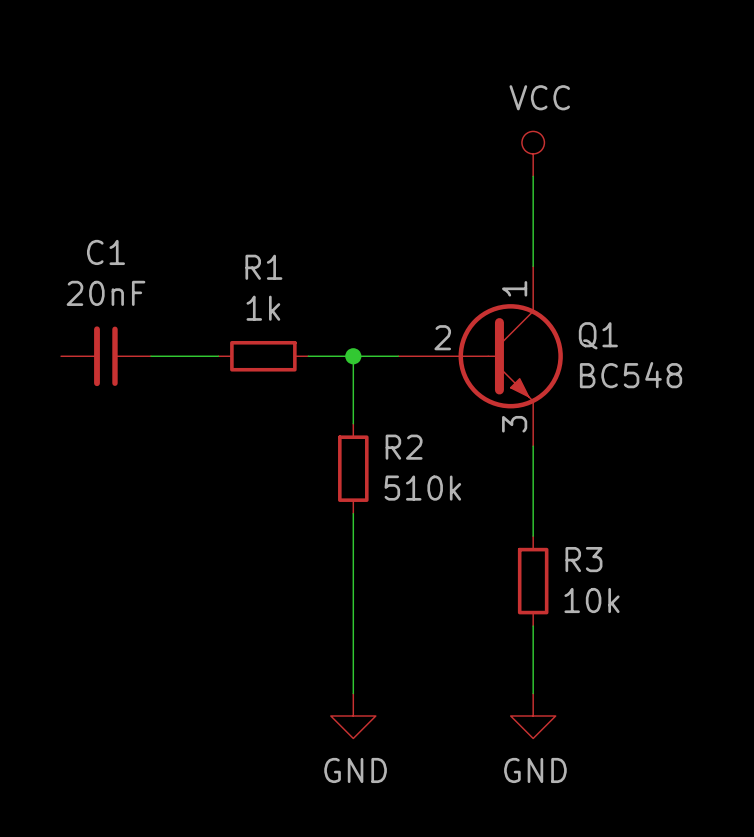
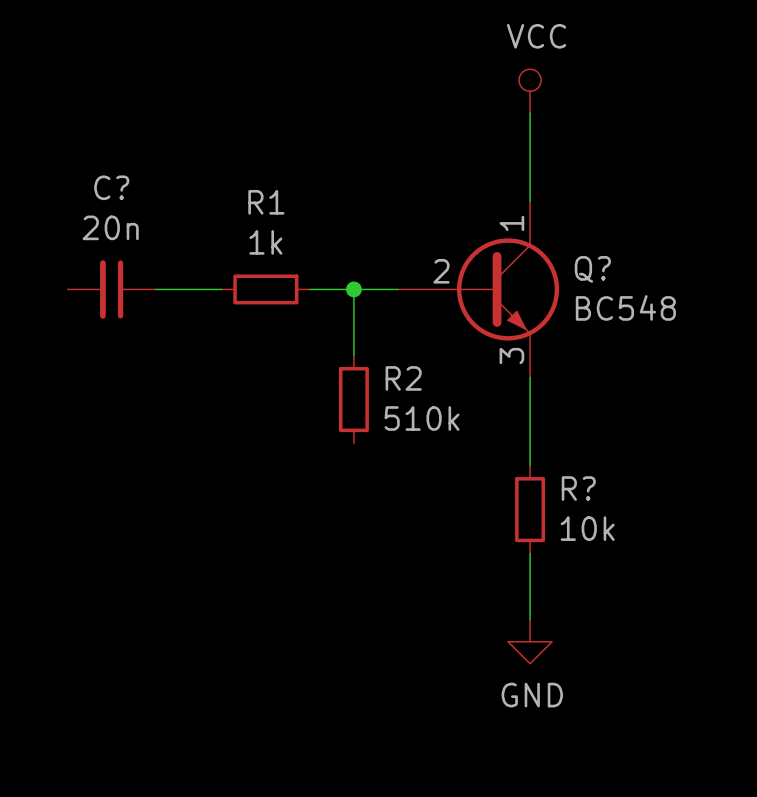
C1 name: C1 (105, 252) -> C? (111, 187)
C1 value: 20nF (105, 293) -> 20n (110, 227)
Q1 name: Q1 (598, 335) -> Q? (592, 269)
wire: (353, 513) (353, 693) -> none
R3 name: R3 (583, 559) -> R? (578, 488)
power symbol: GND (353, 716) -> none

